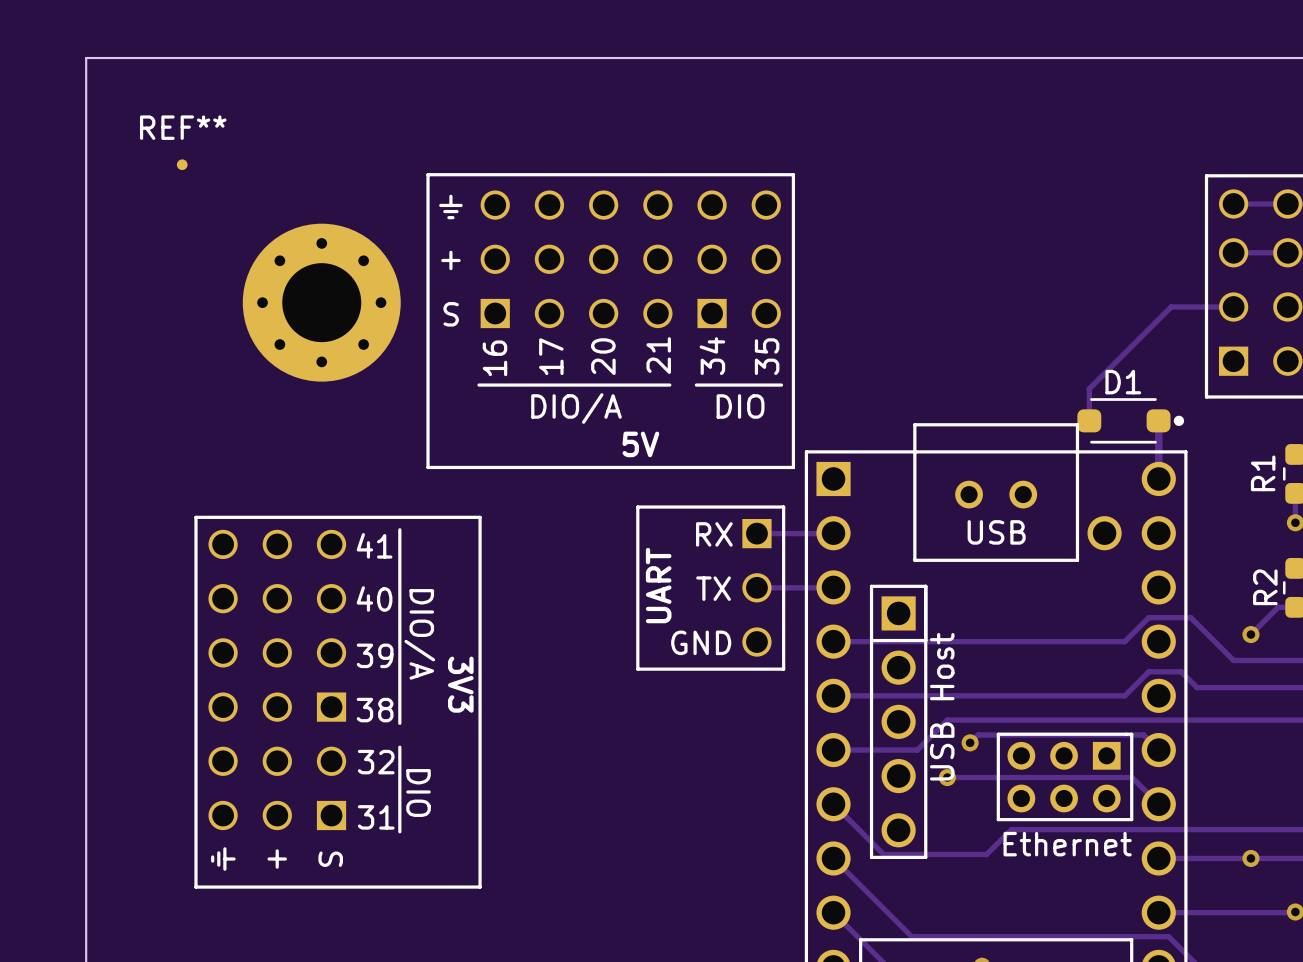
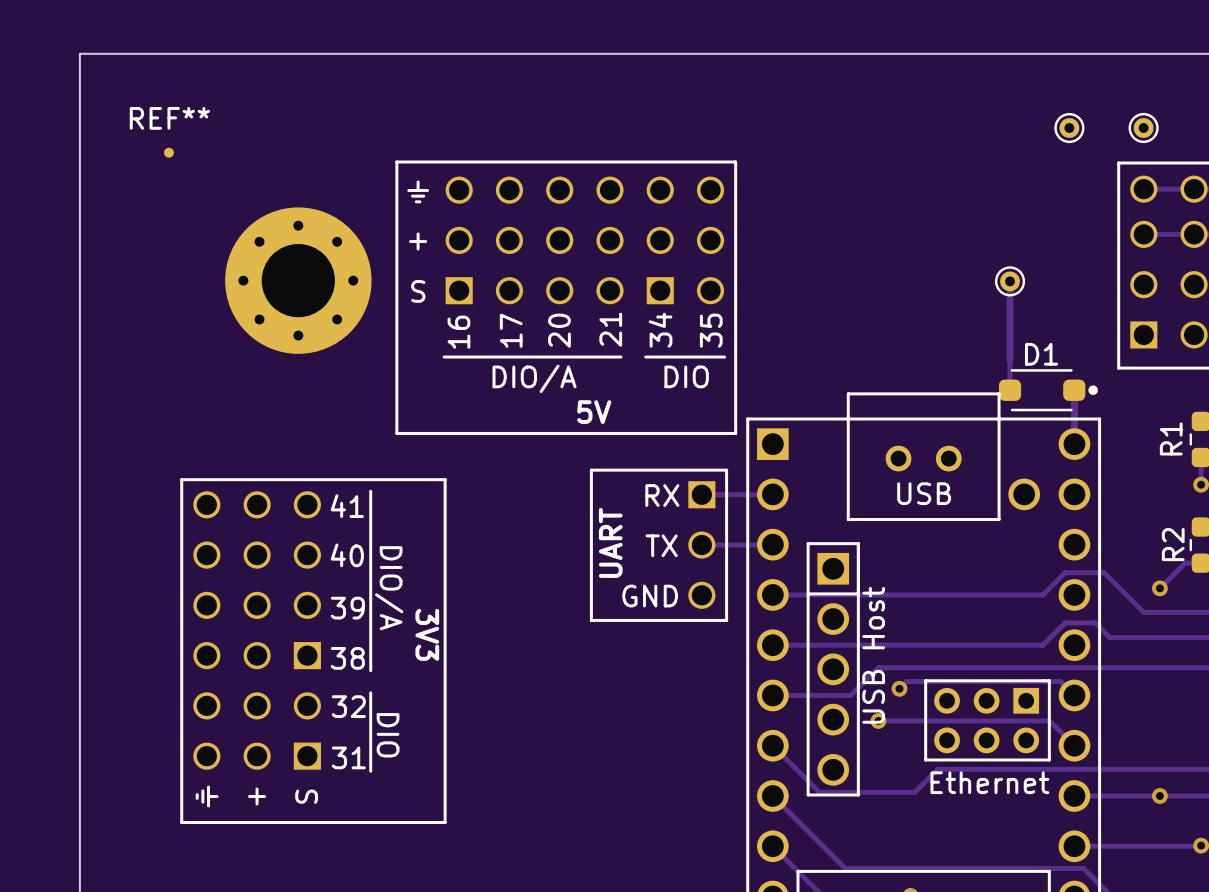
part: none -> (1069, 128)
part: none -> (1143, 128)
part: none -> (1010, 281)
track: (1233, 307) (1171, 307) (1089, 388) -> (1010, 281) (1010, 360)

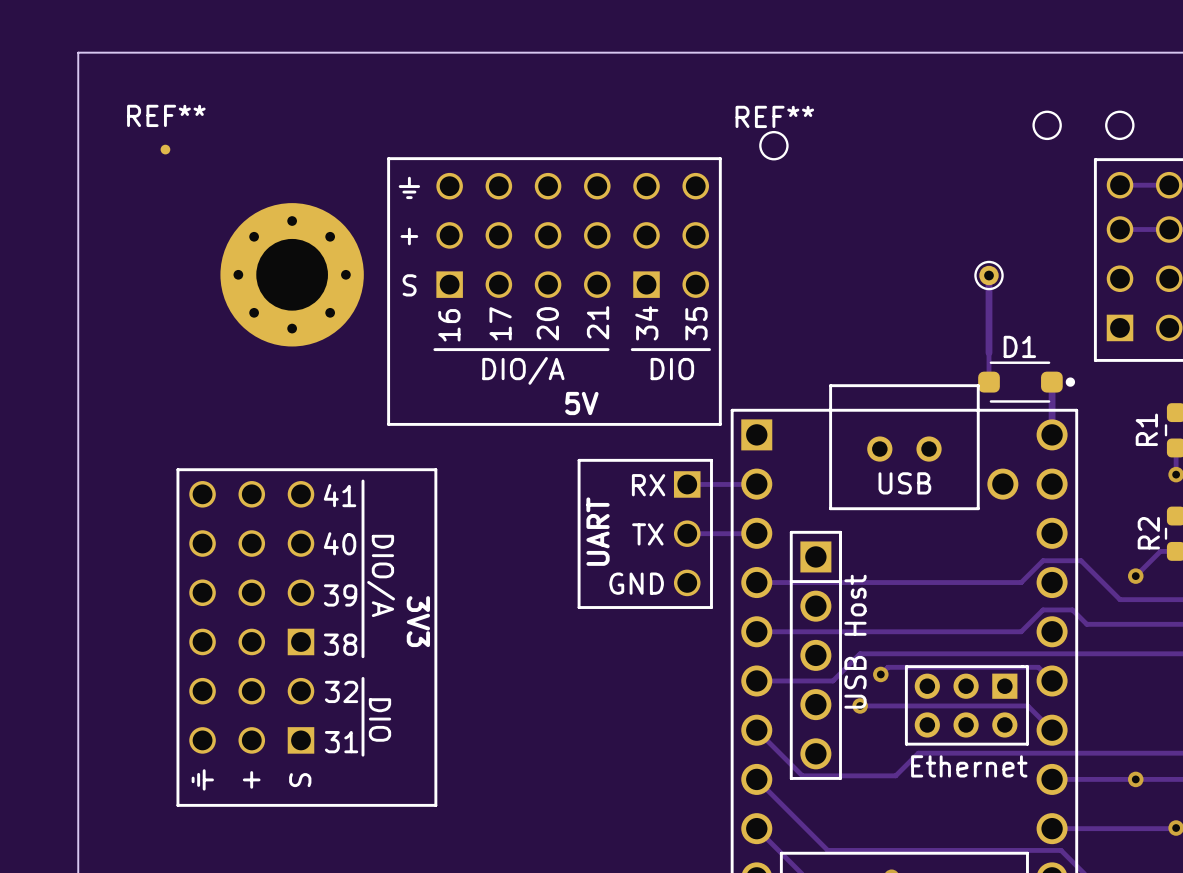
part footprint: [1054, 112, 1085, 144] -> [1032, 110, 1062, 141]
part footprint: [1128, 112, 1159, 144] -> [1105, 110, 1135, 141]
REF**: none -> (773, 145)

